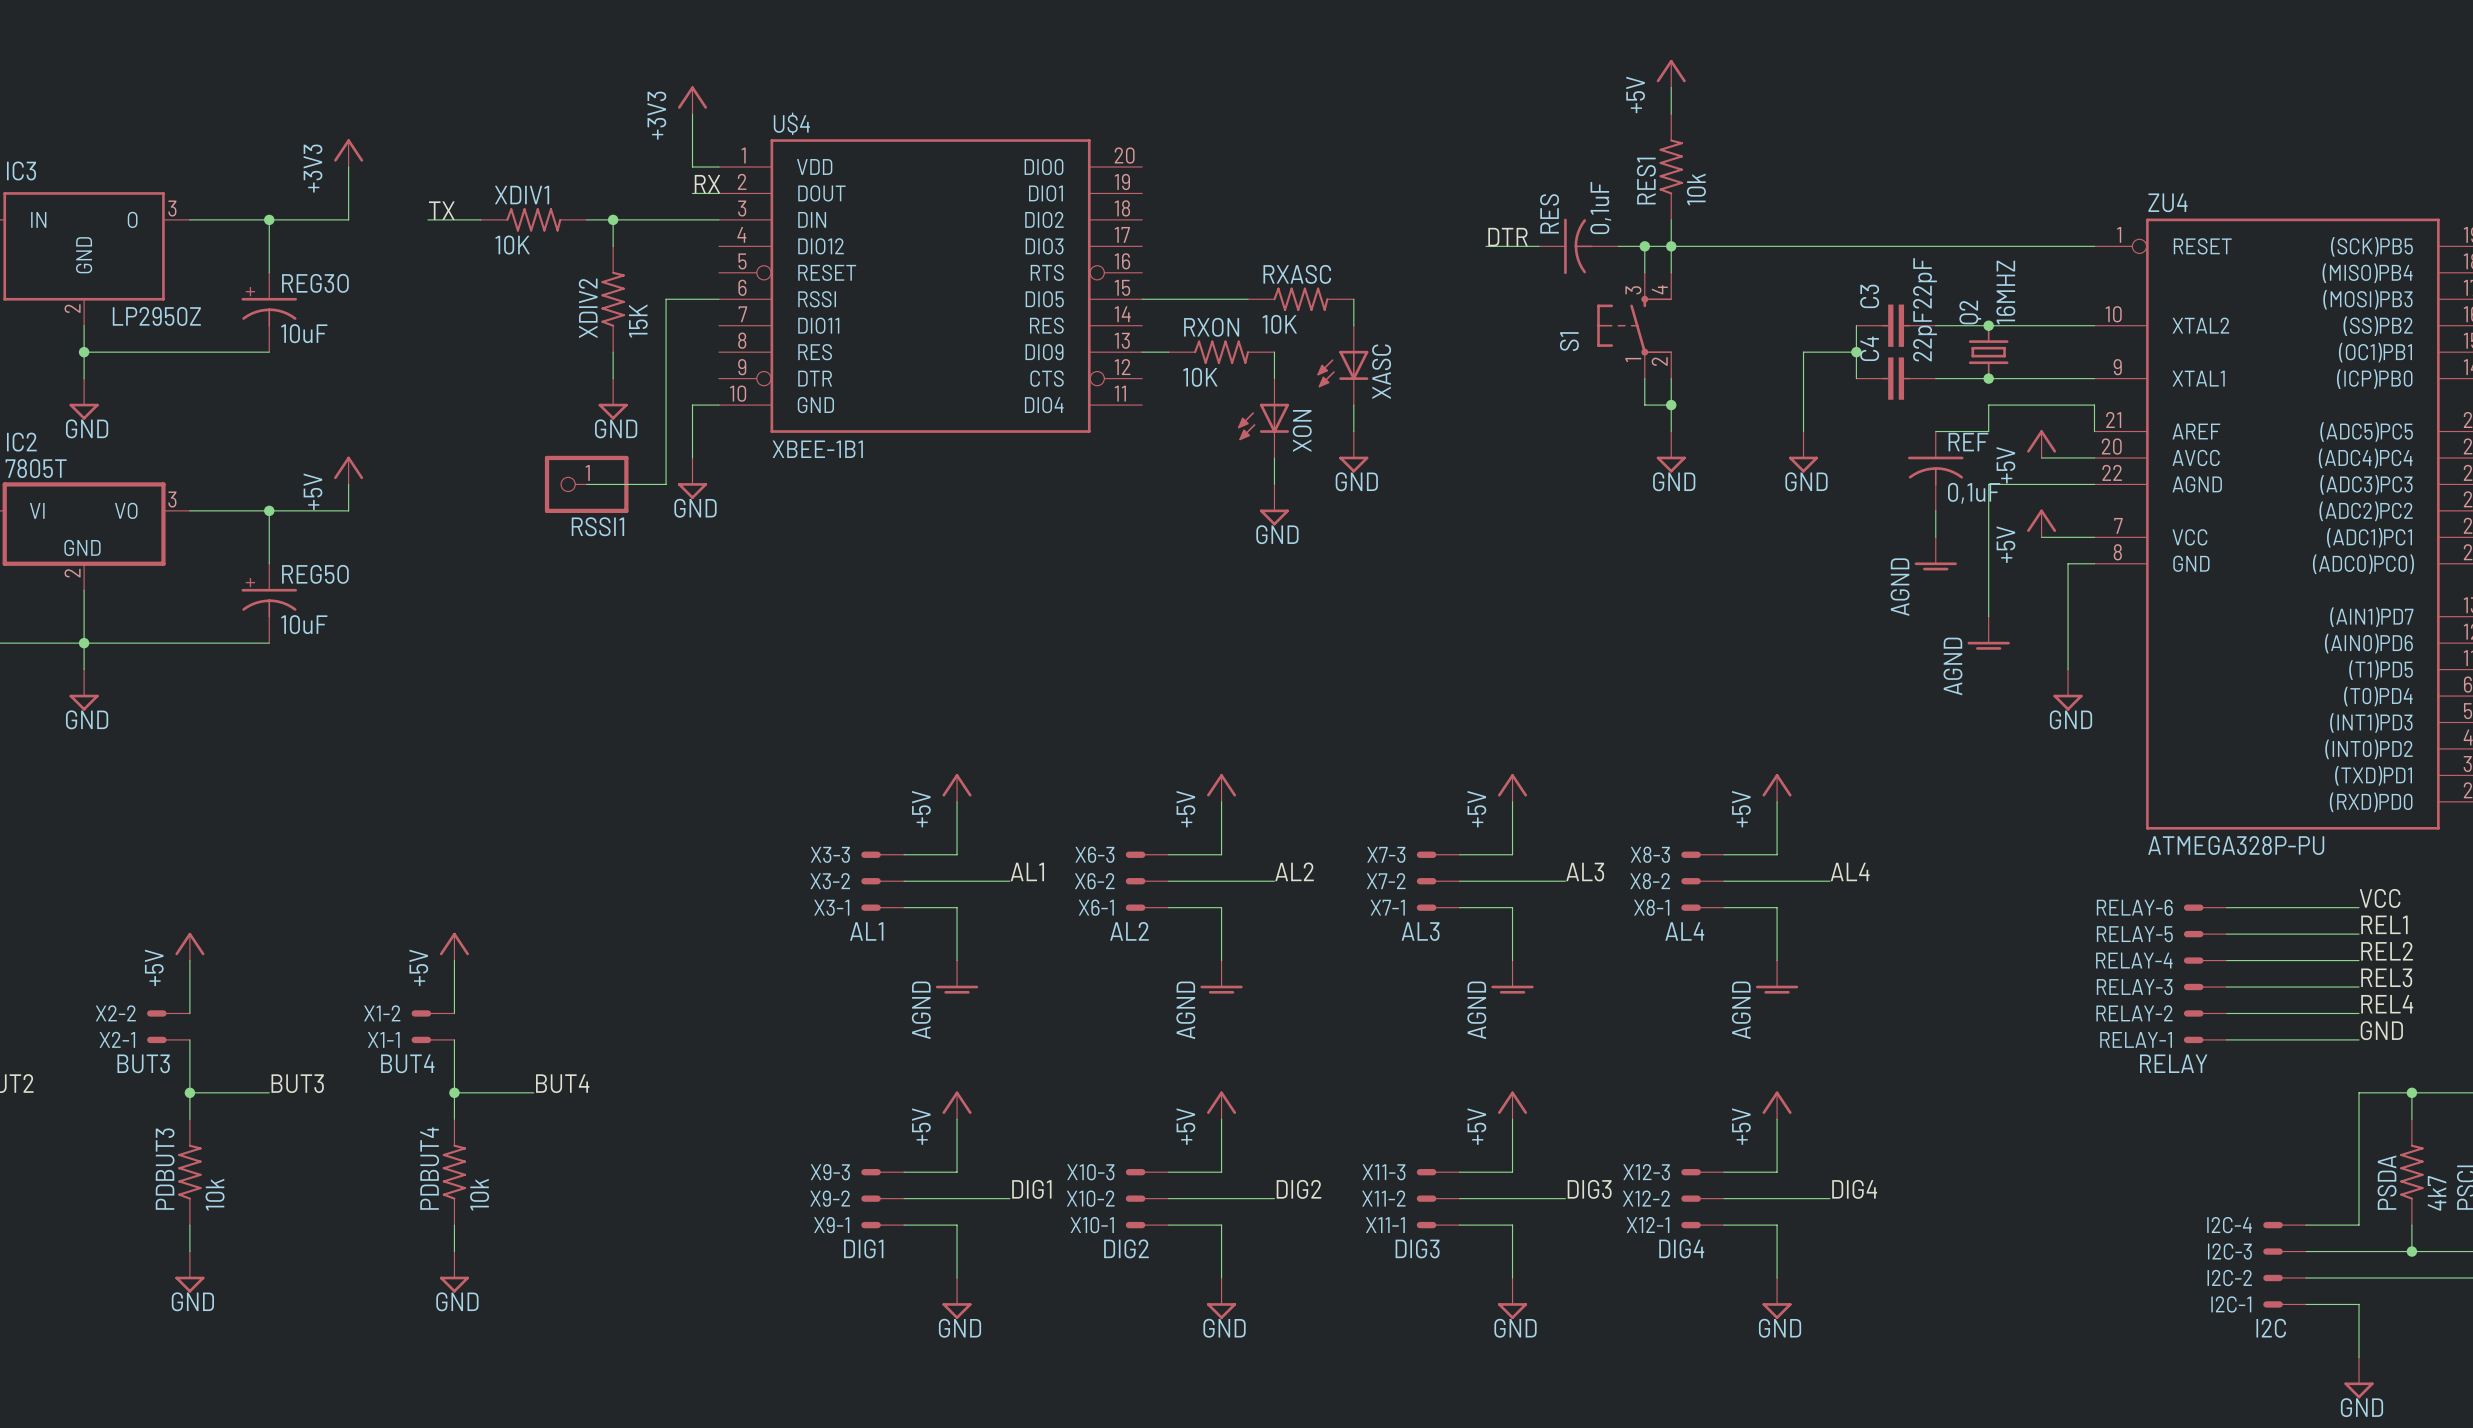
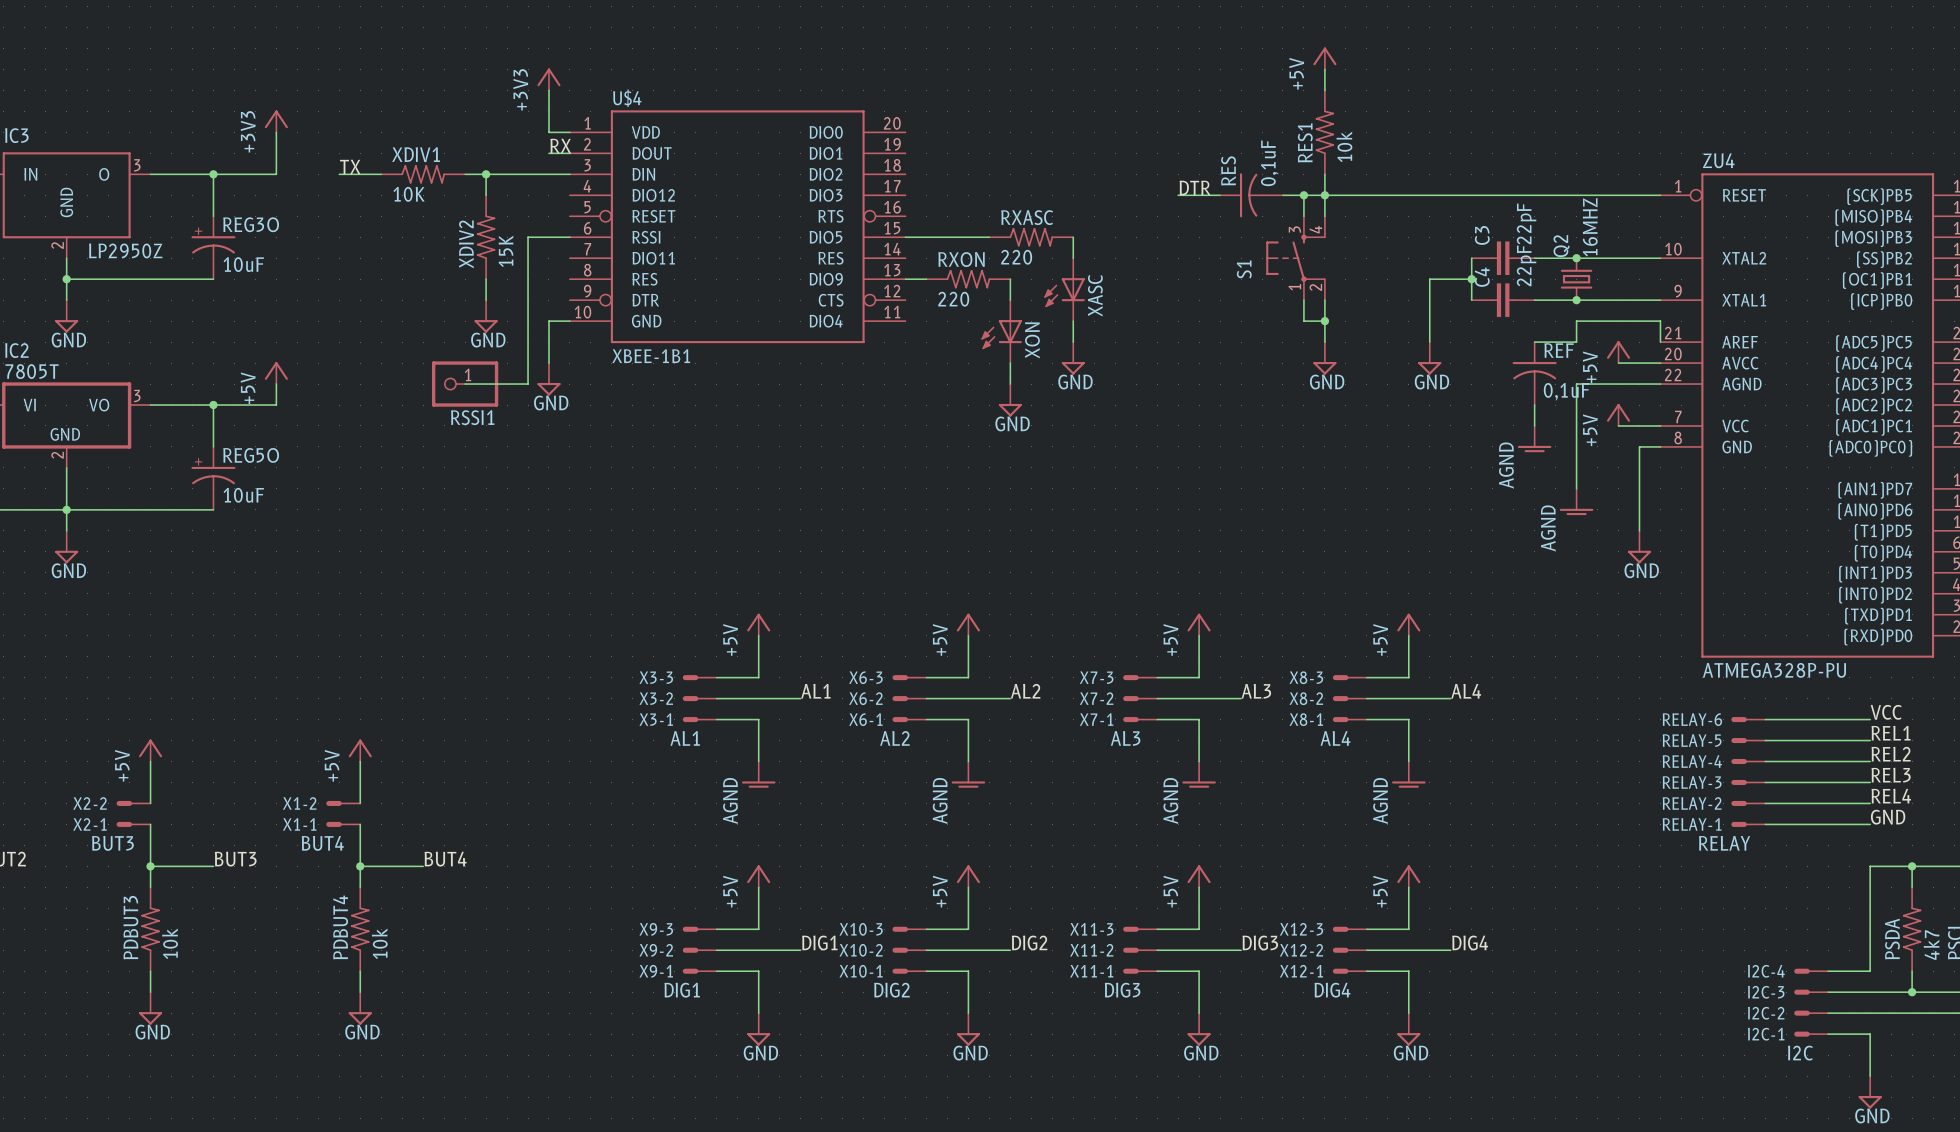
RXASC value: 10K (1279, 324) -> 220 (1016, 257)
RXON value: 10K (1200, 377) -> 220 (953, 299)

